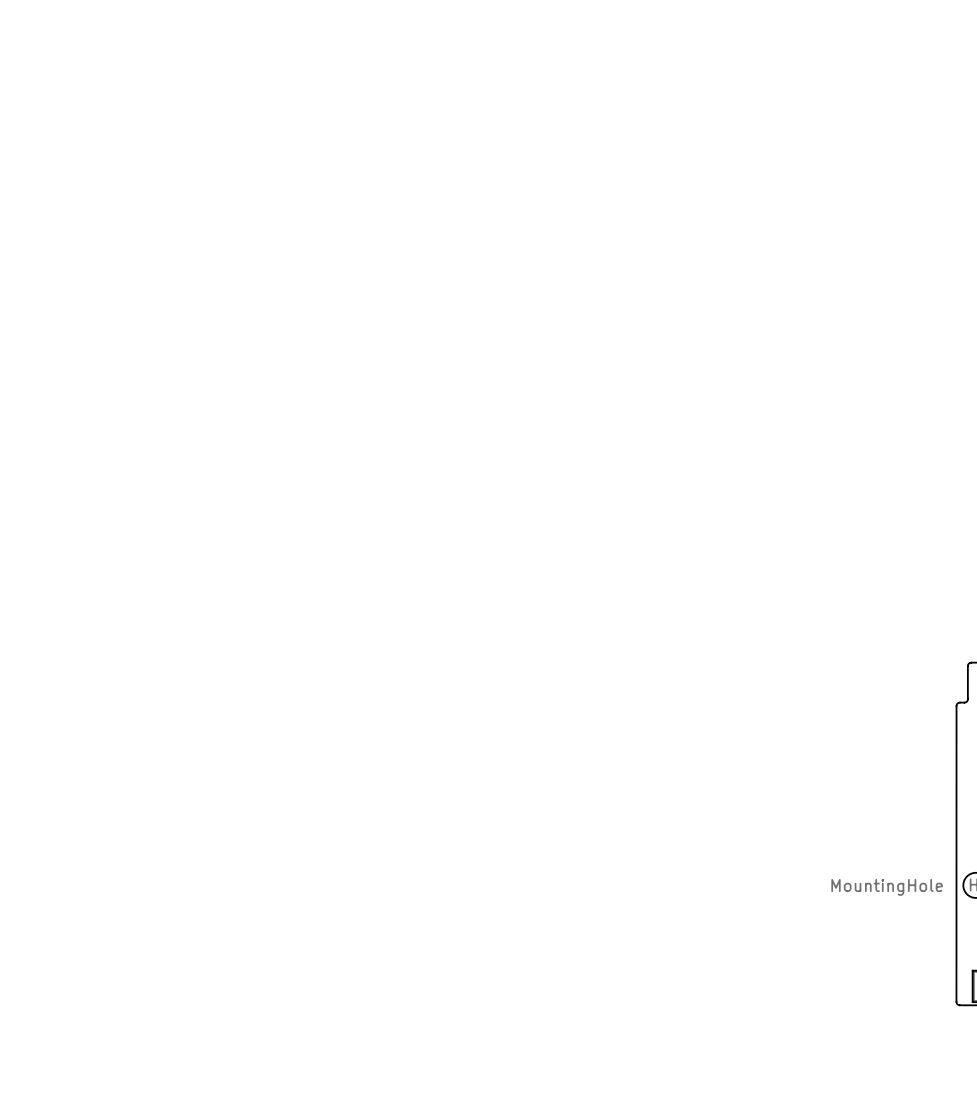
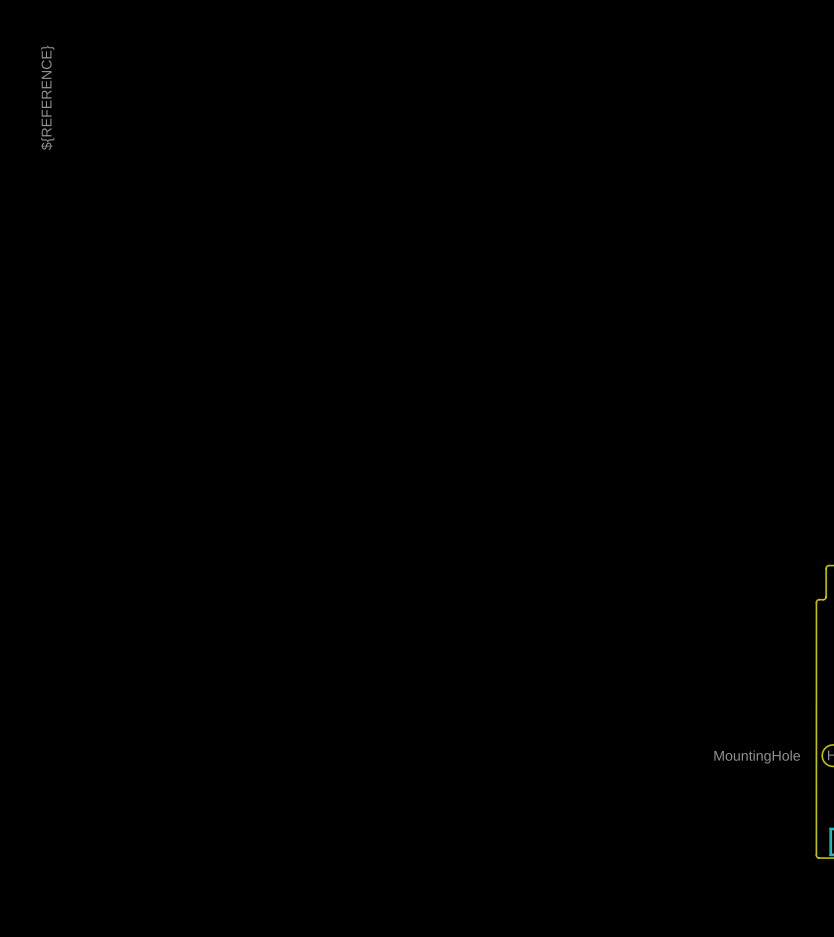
text: none -> ${REFERENCE} (47, 97)

